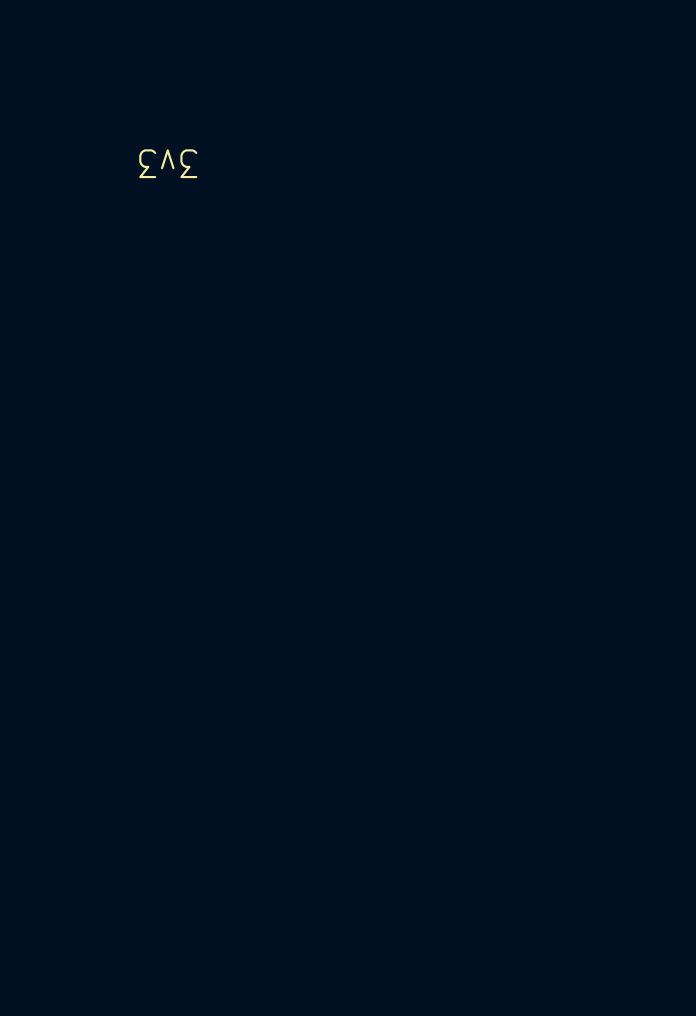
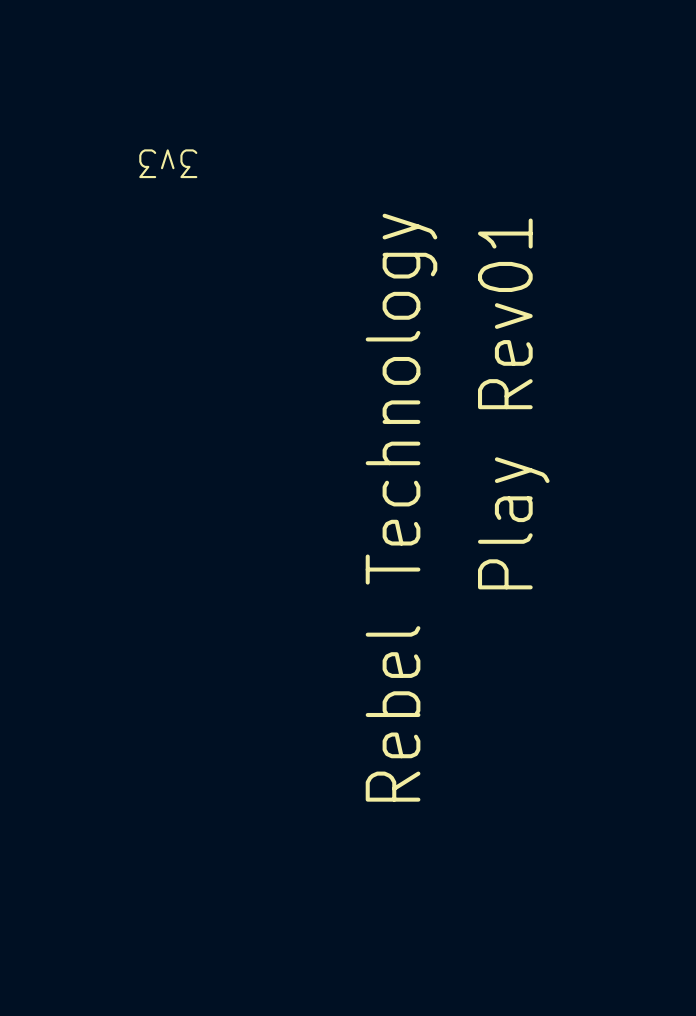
text: none -> Play Rev01 (513, 403)
text: none -> Rebel Technology (401, 507)

